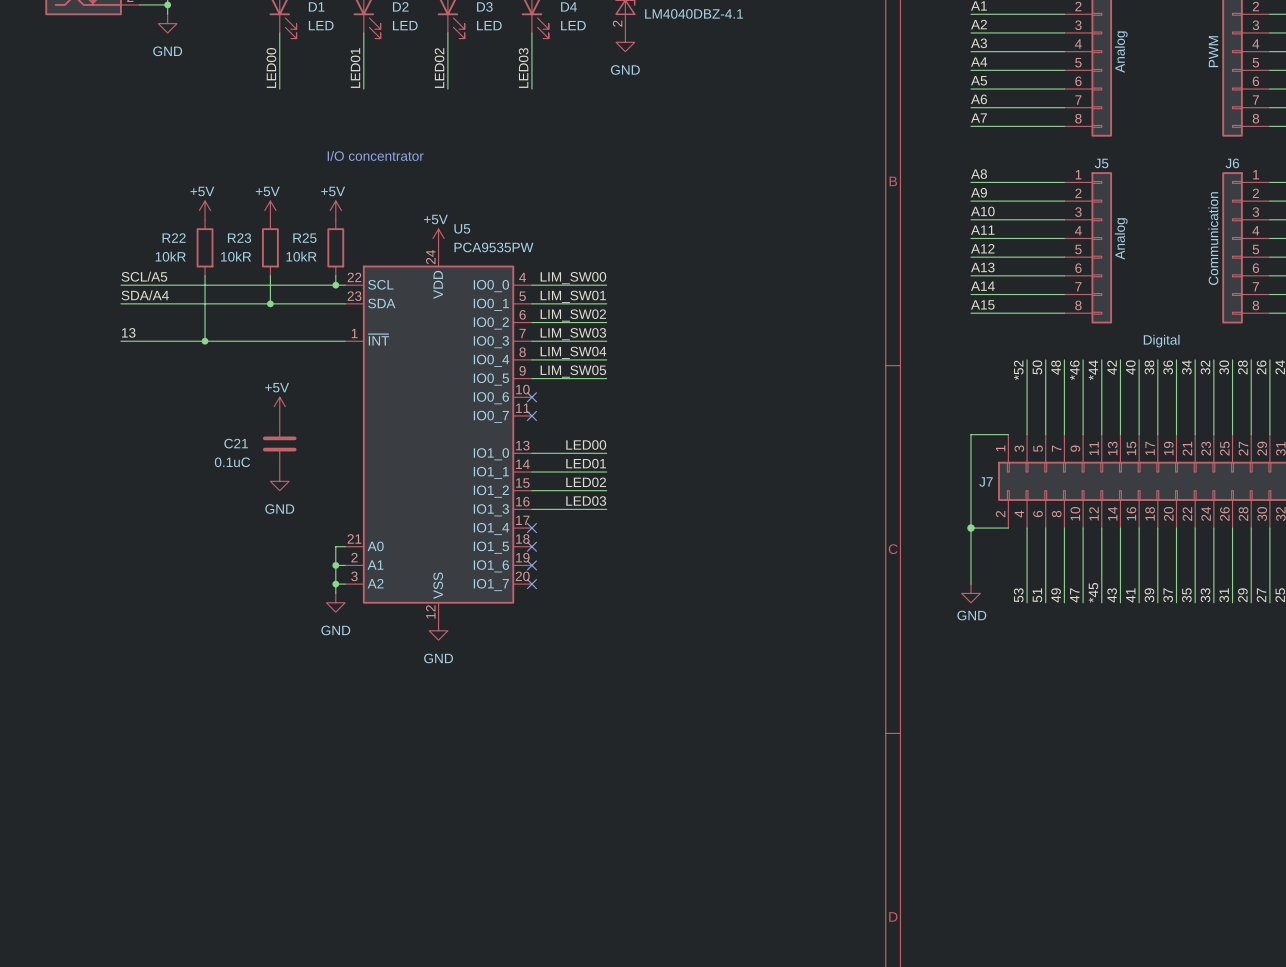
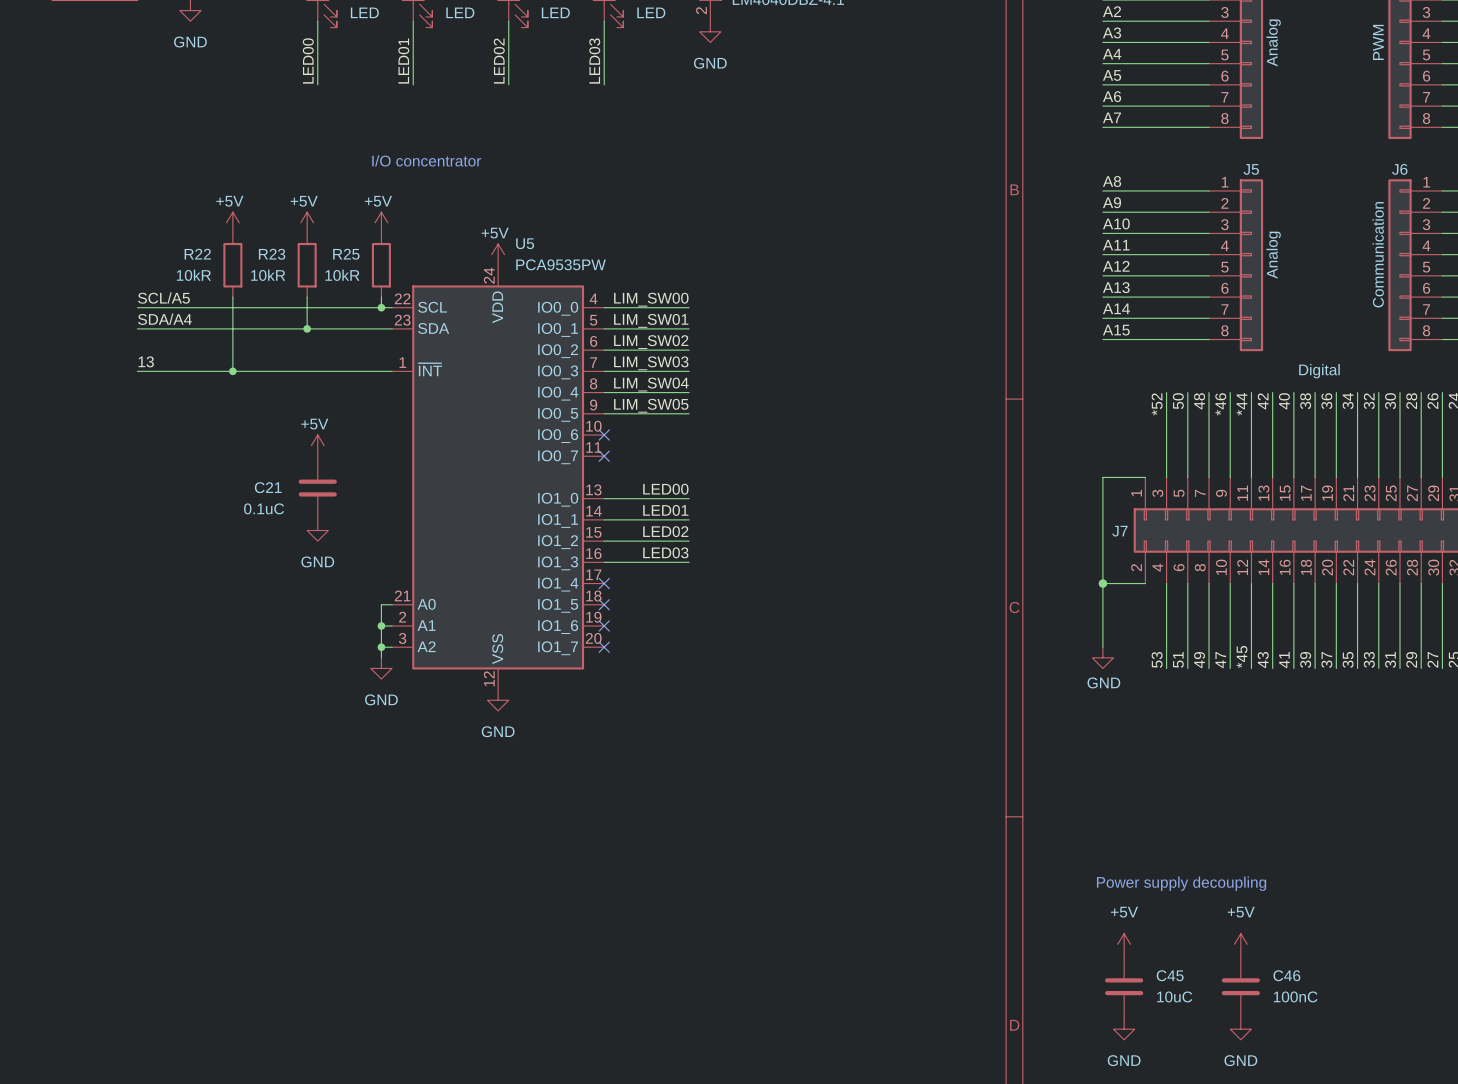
text: none -> Power supply decoupling (1181, 883)
power symbol: none -> +5V (1124, 944)
power symbol: none -> +5V (1240, 944)
C45: none -> 10uC (1124, 986)
C46: none -> 100nC (1240, 986)
power symbol: none -> GND (1124, 1029)
power symbol: none -> GND (1240, 1029)

